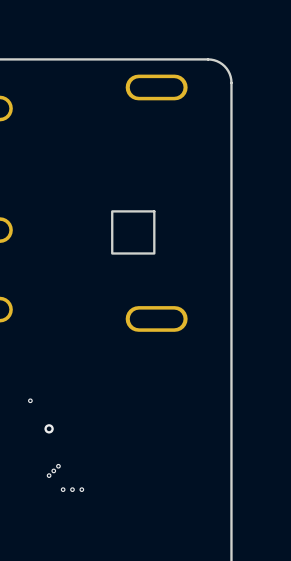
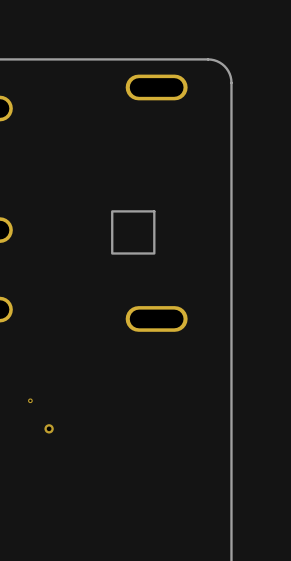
via: (58, 466) -> none
via: (53, 470) -> none
via: (49, 475) -> none
via: (63, 489) -> none
via: (72, 489) -> none
via: (81, 489) -> none

